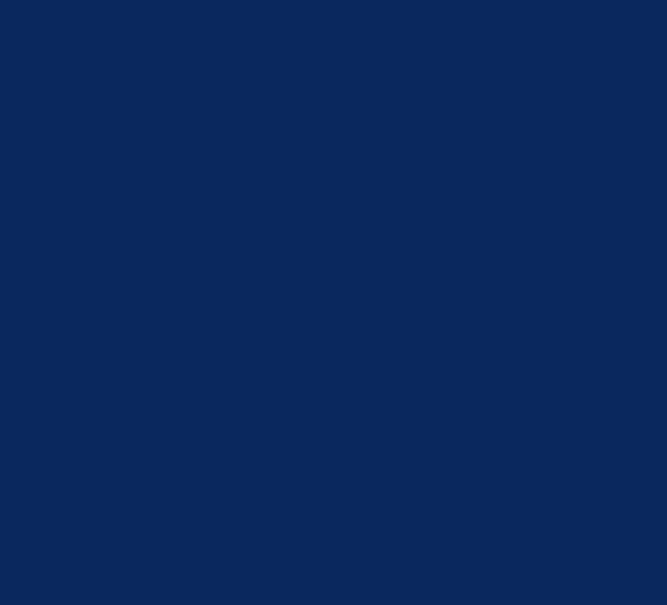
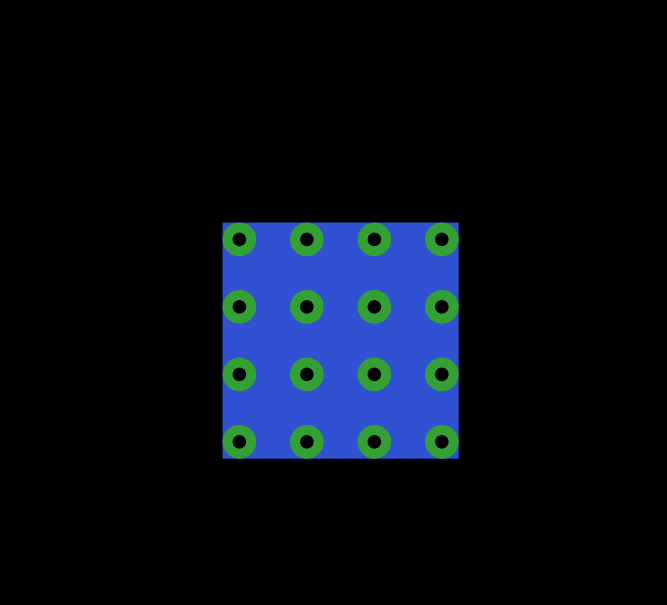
part: none -> (340, 340)

